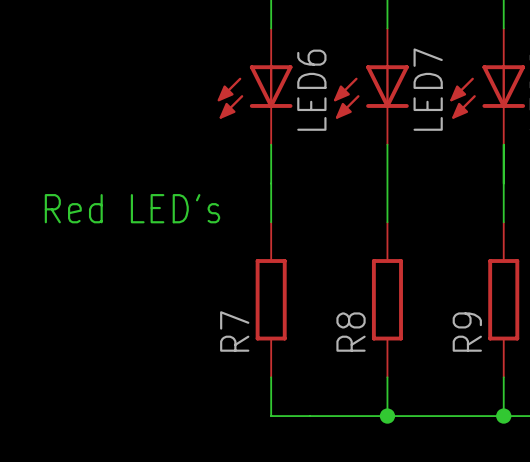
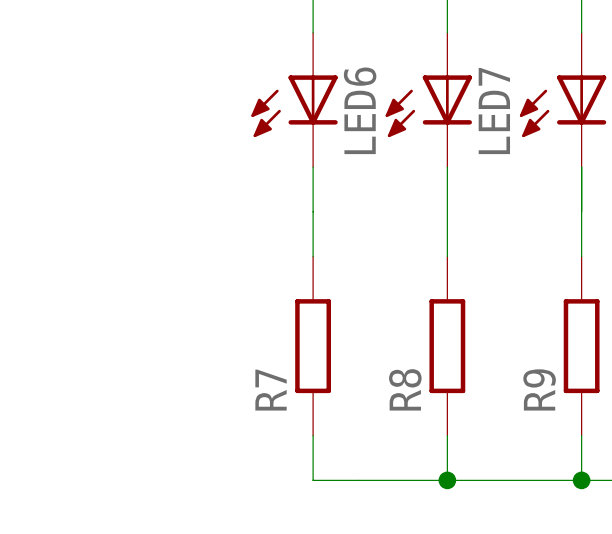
text: Red LED's (132, 208) -> none

